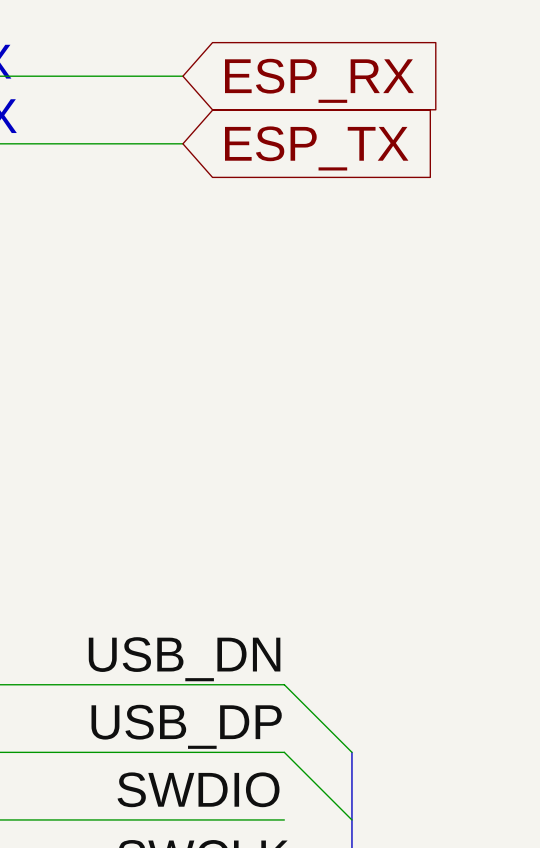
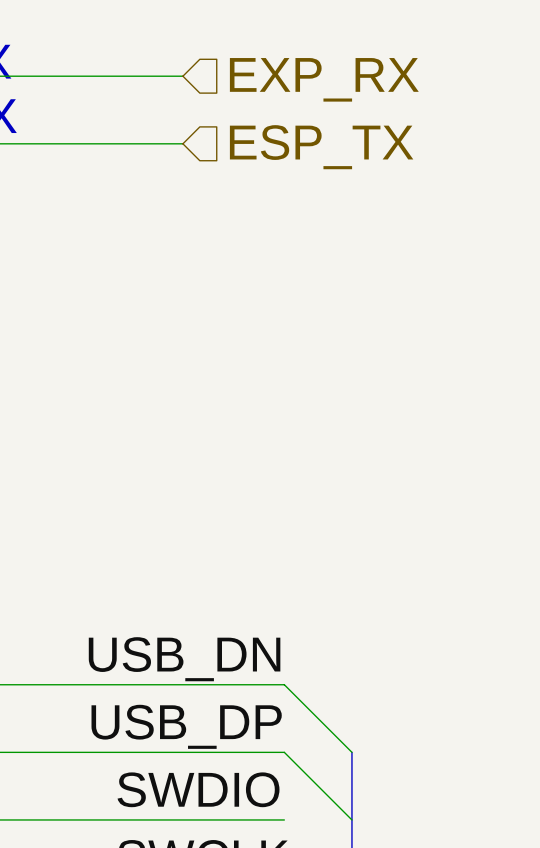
hierarchical label: none -> EXP_RX (324, 79)
global label: ESP_RX (319, 80) -> none
hierarchical label: none -> ESP_TX (321, 147)
global label: ESP_TX (316, 148) -> none

